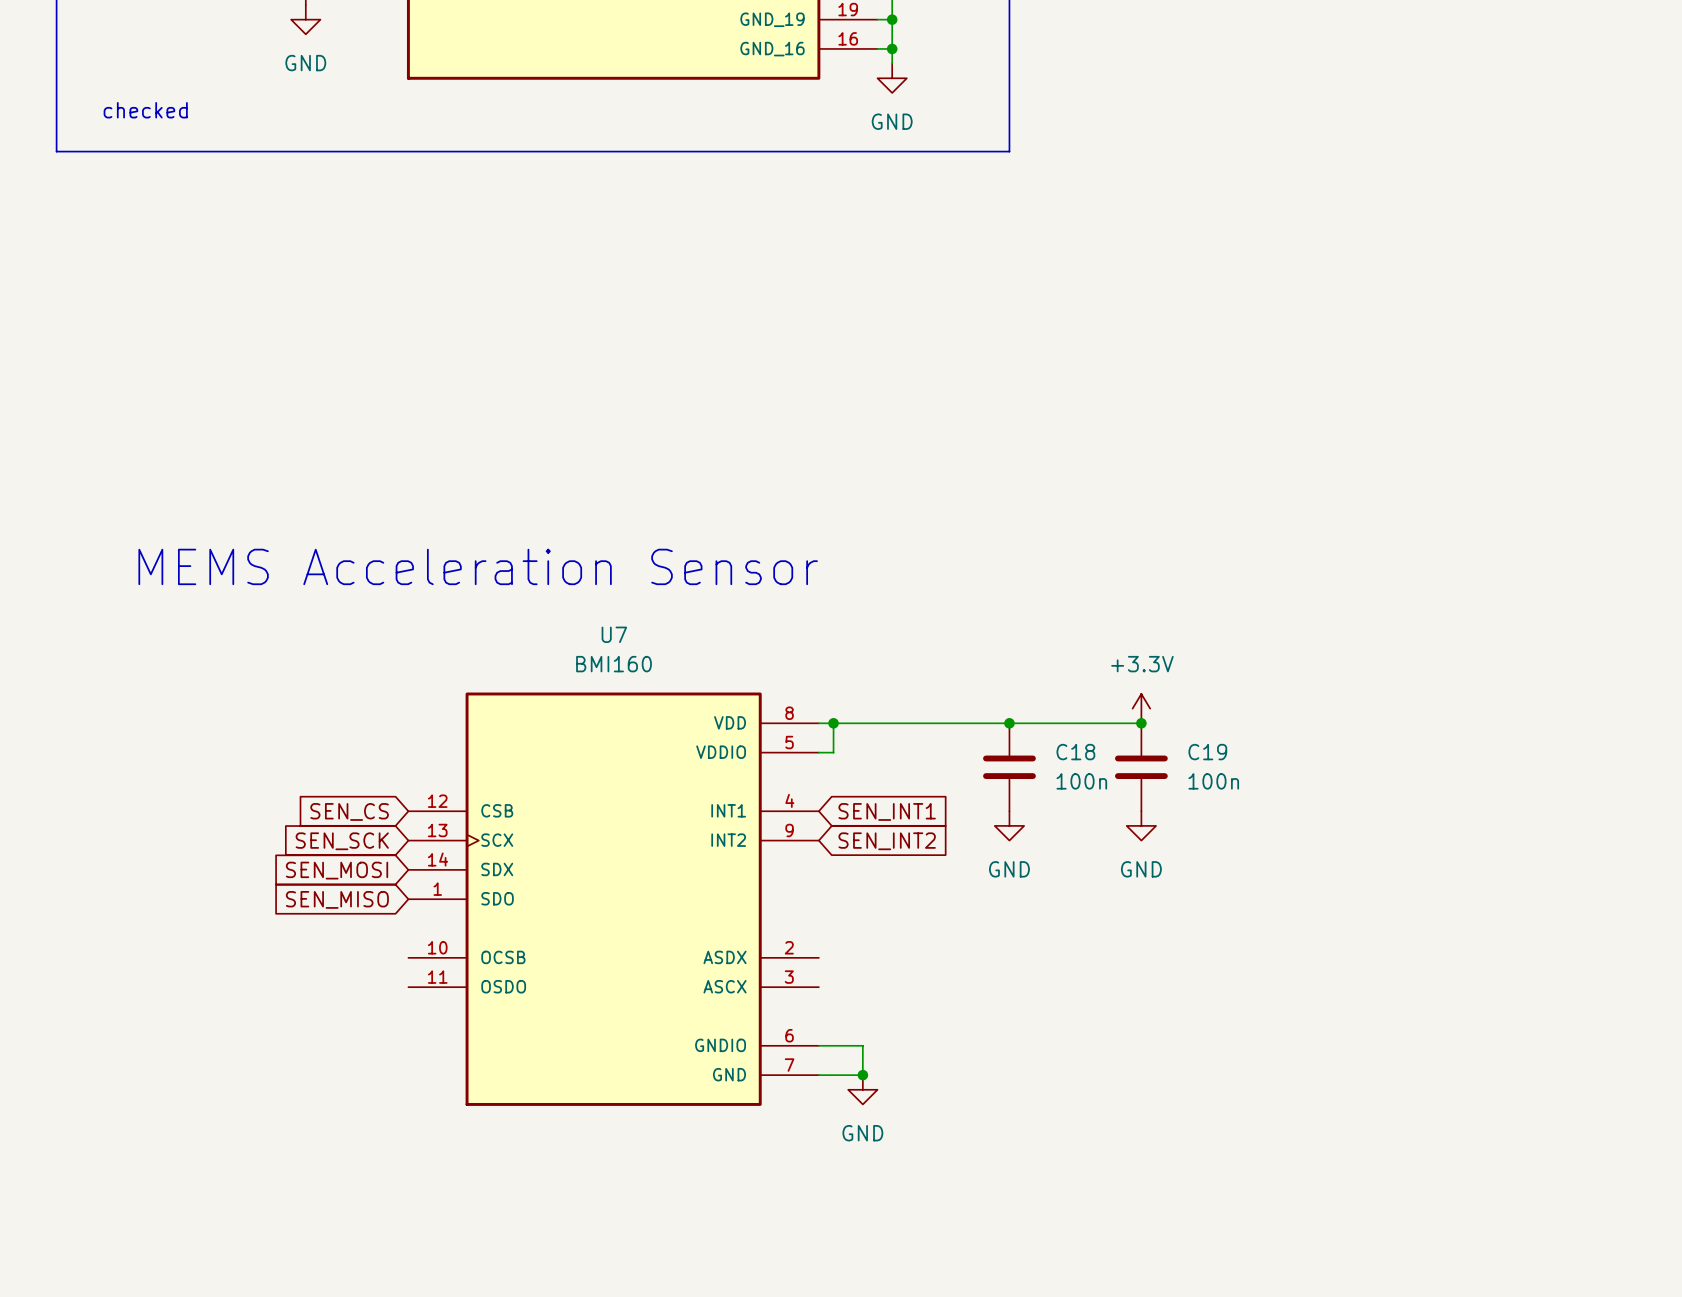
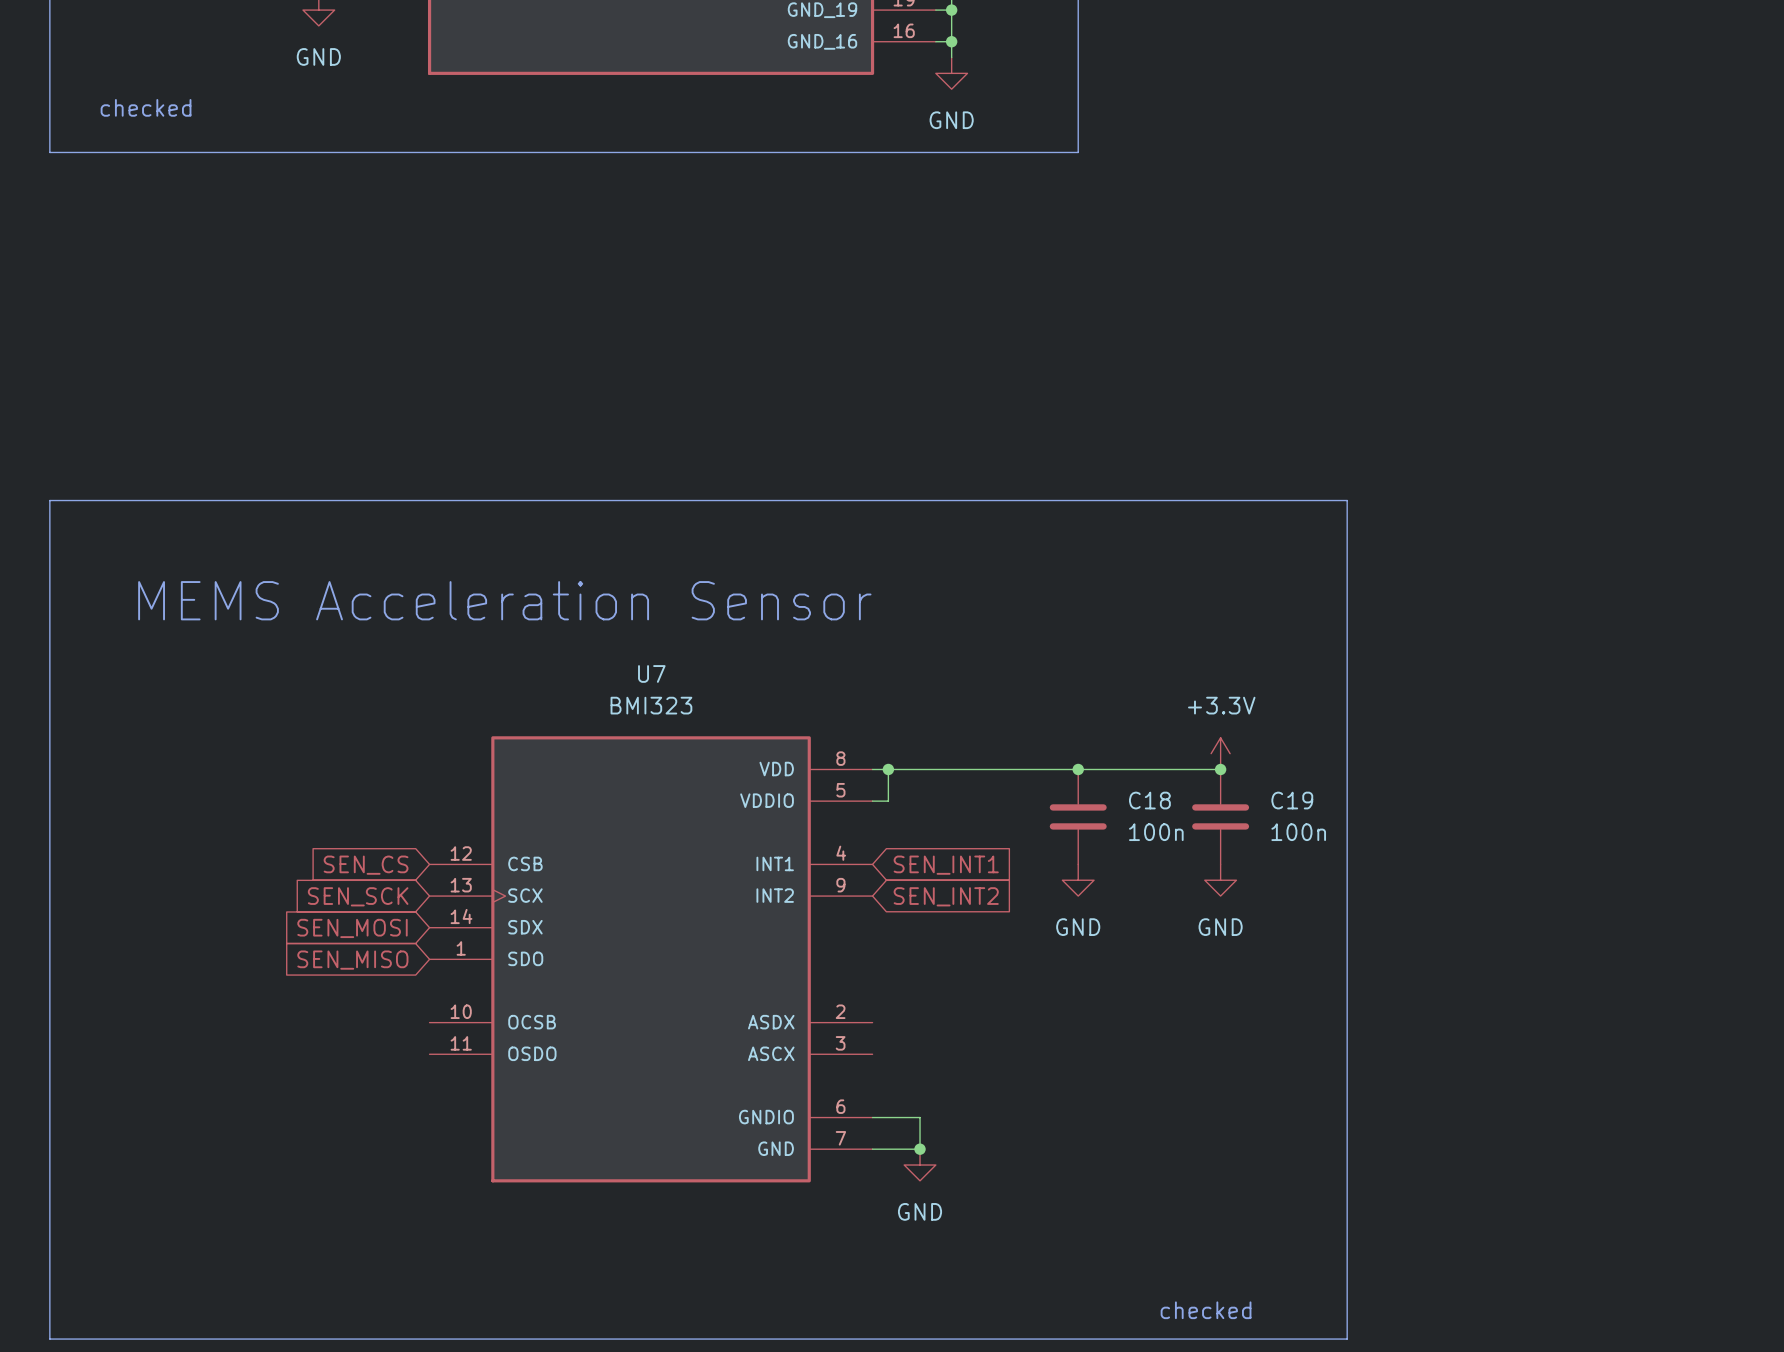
line: none -> (49, 500) (1347, 500) (1347, 1339) (49, 1339) (49, 500)
U7 value: BMI160 (614, 664) -> BMI323 (651, 705)
text: none -> checked (1206, 1310)

